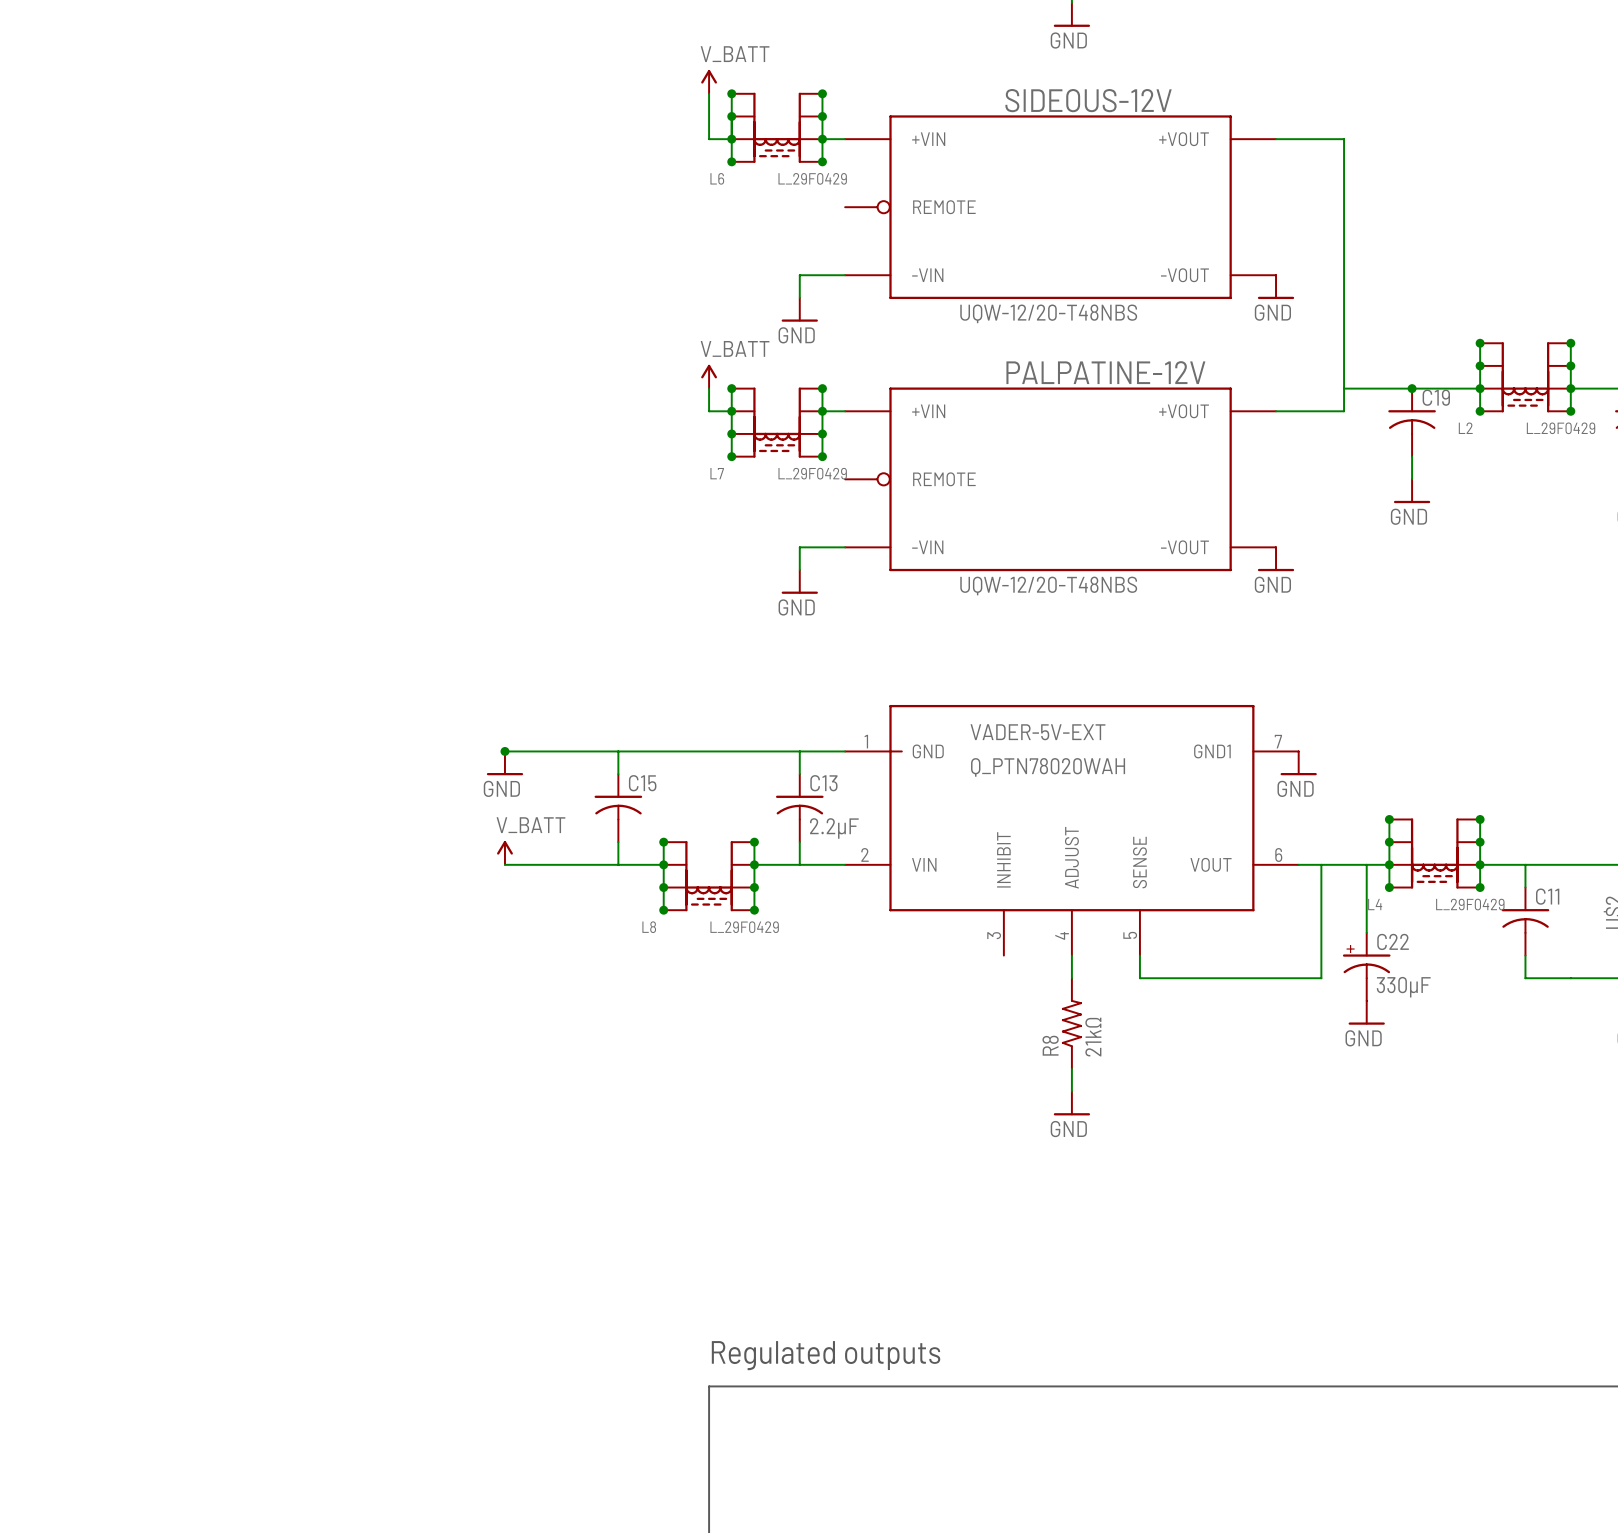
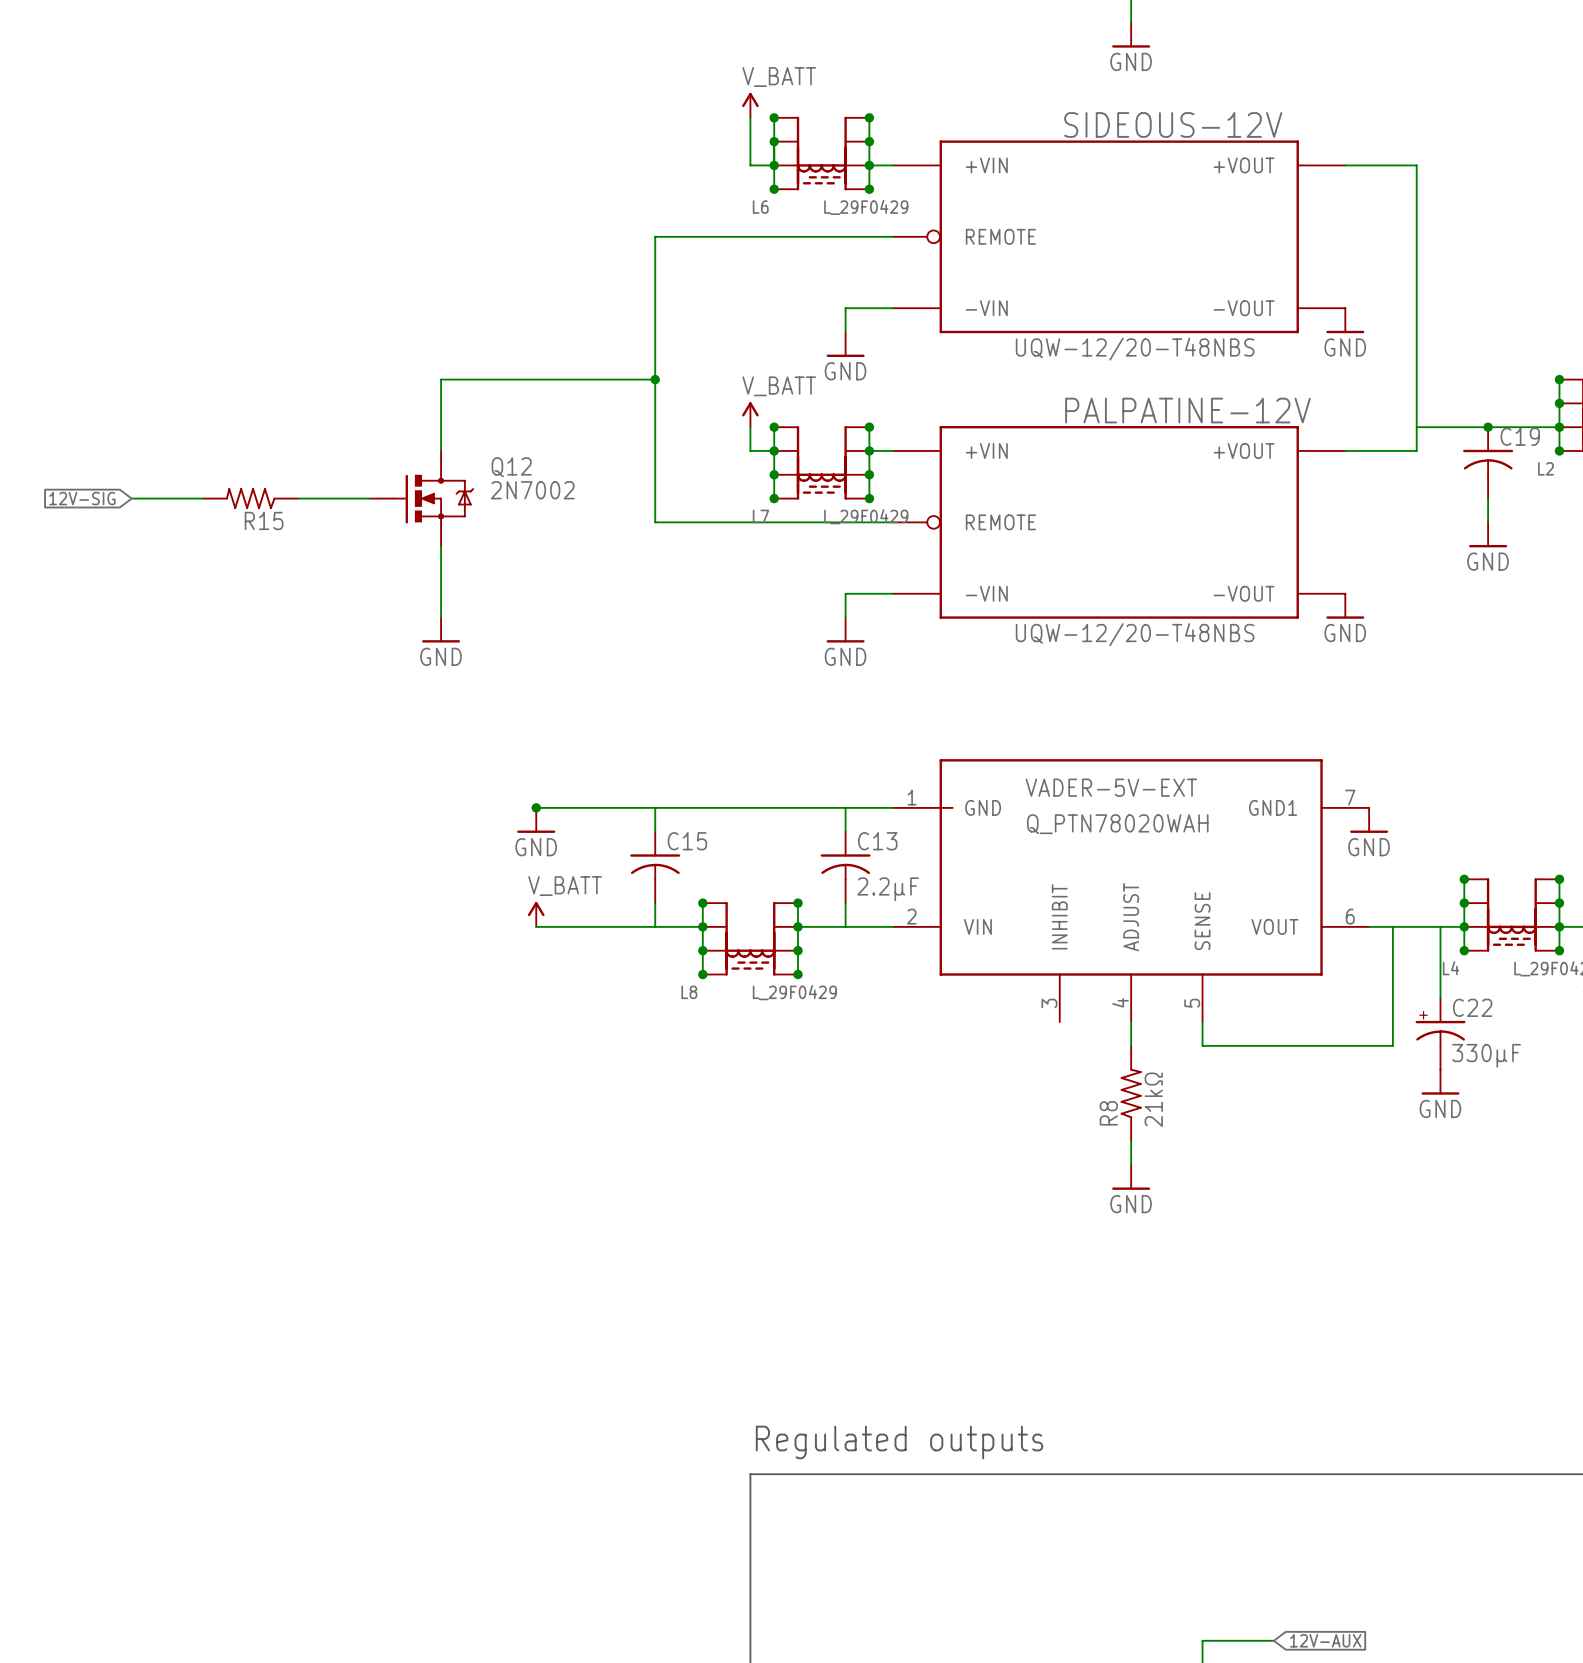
wire: none -> (893, 236) (655, 236) (655, 522) (893, 522)
wire: none -> (655, 379) (441, 379) (441, 450)
junction: none -> (655, 379)
global label: none -> 12V-SIG (82, 498)
wire: none -> (131, 498) (203, 498)
R15: none -> (250, 498)
wire: none -> (298, 498) (369, 498)
Q12: none -> 2N7002 (421, 498)
wire: none -> (441, 546) (441, 617)
power symbol: none -> GND (441, 630)

